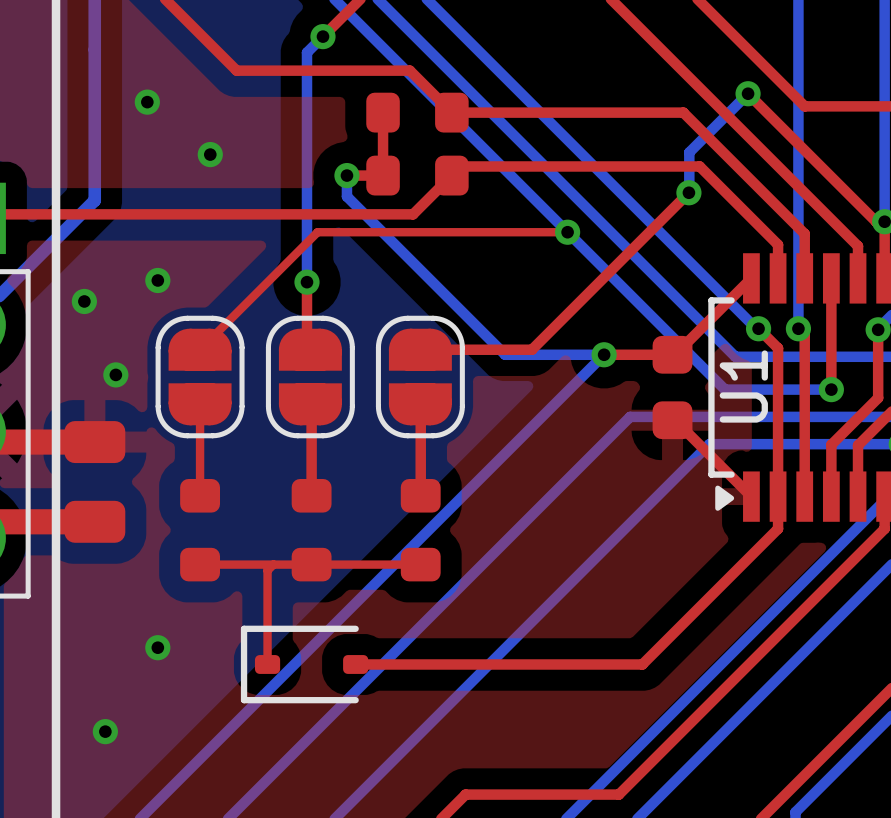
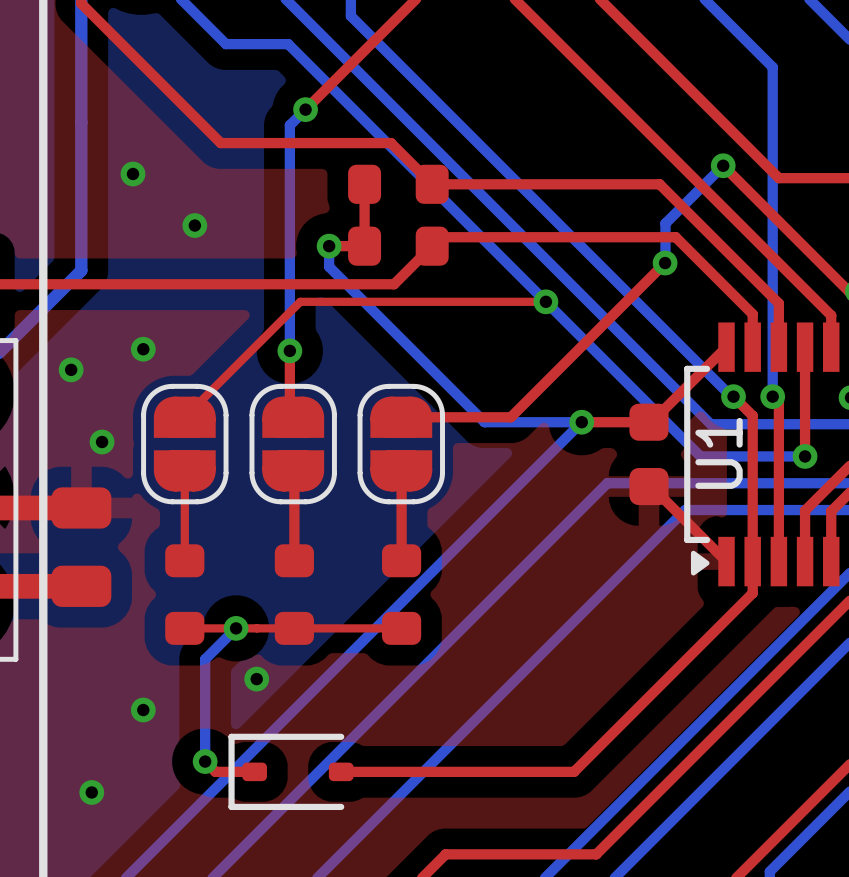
bottom track: none -> (236, 628) (205, 659) (205, 761)
via: none -> (236, 628)
top track: (273, 564) (267, 570) (267, 664) -> none
via: none -> (256, 679)
part position: (304, 664) -> (291, 771)
top track: (355, 664) (642, 664) -> (341, 771) (574, 771) (619, 726)
top track: none -> (205, 761) (215, 771) (254, 771)
via: none -> (205, 761)

